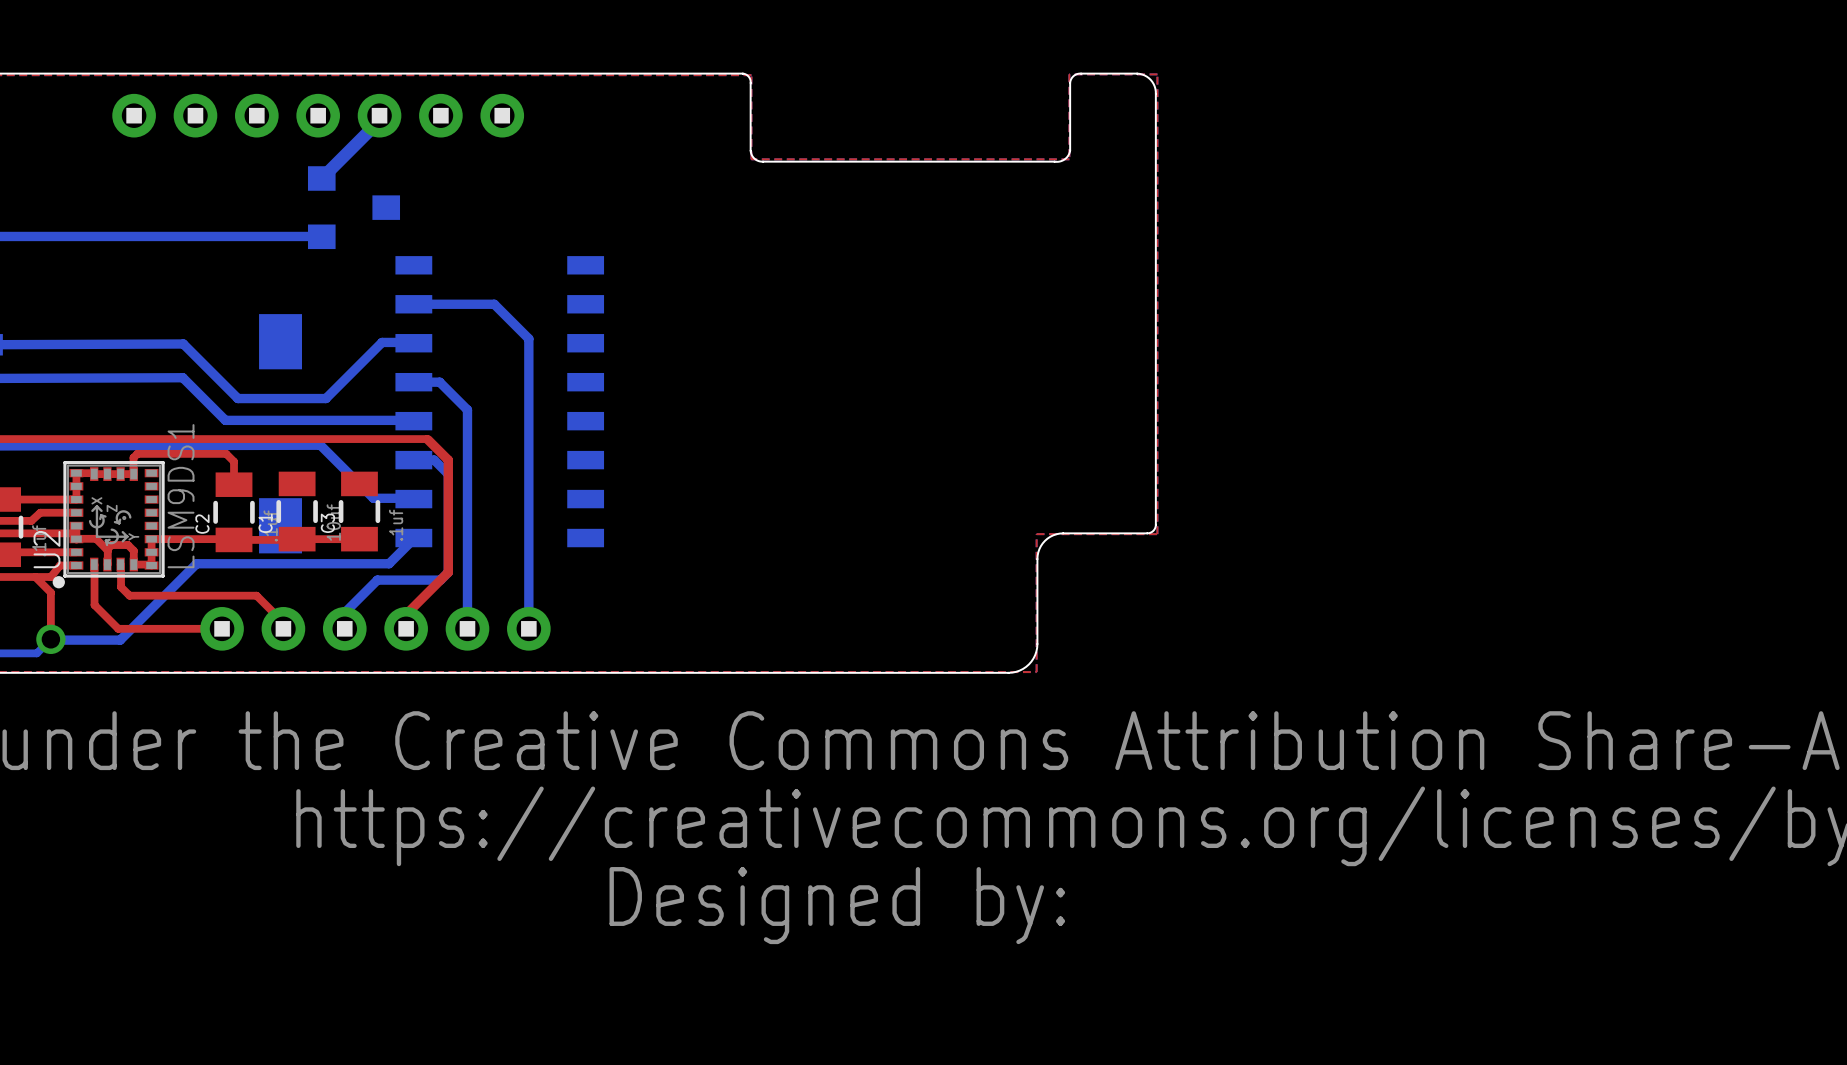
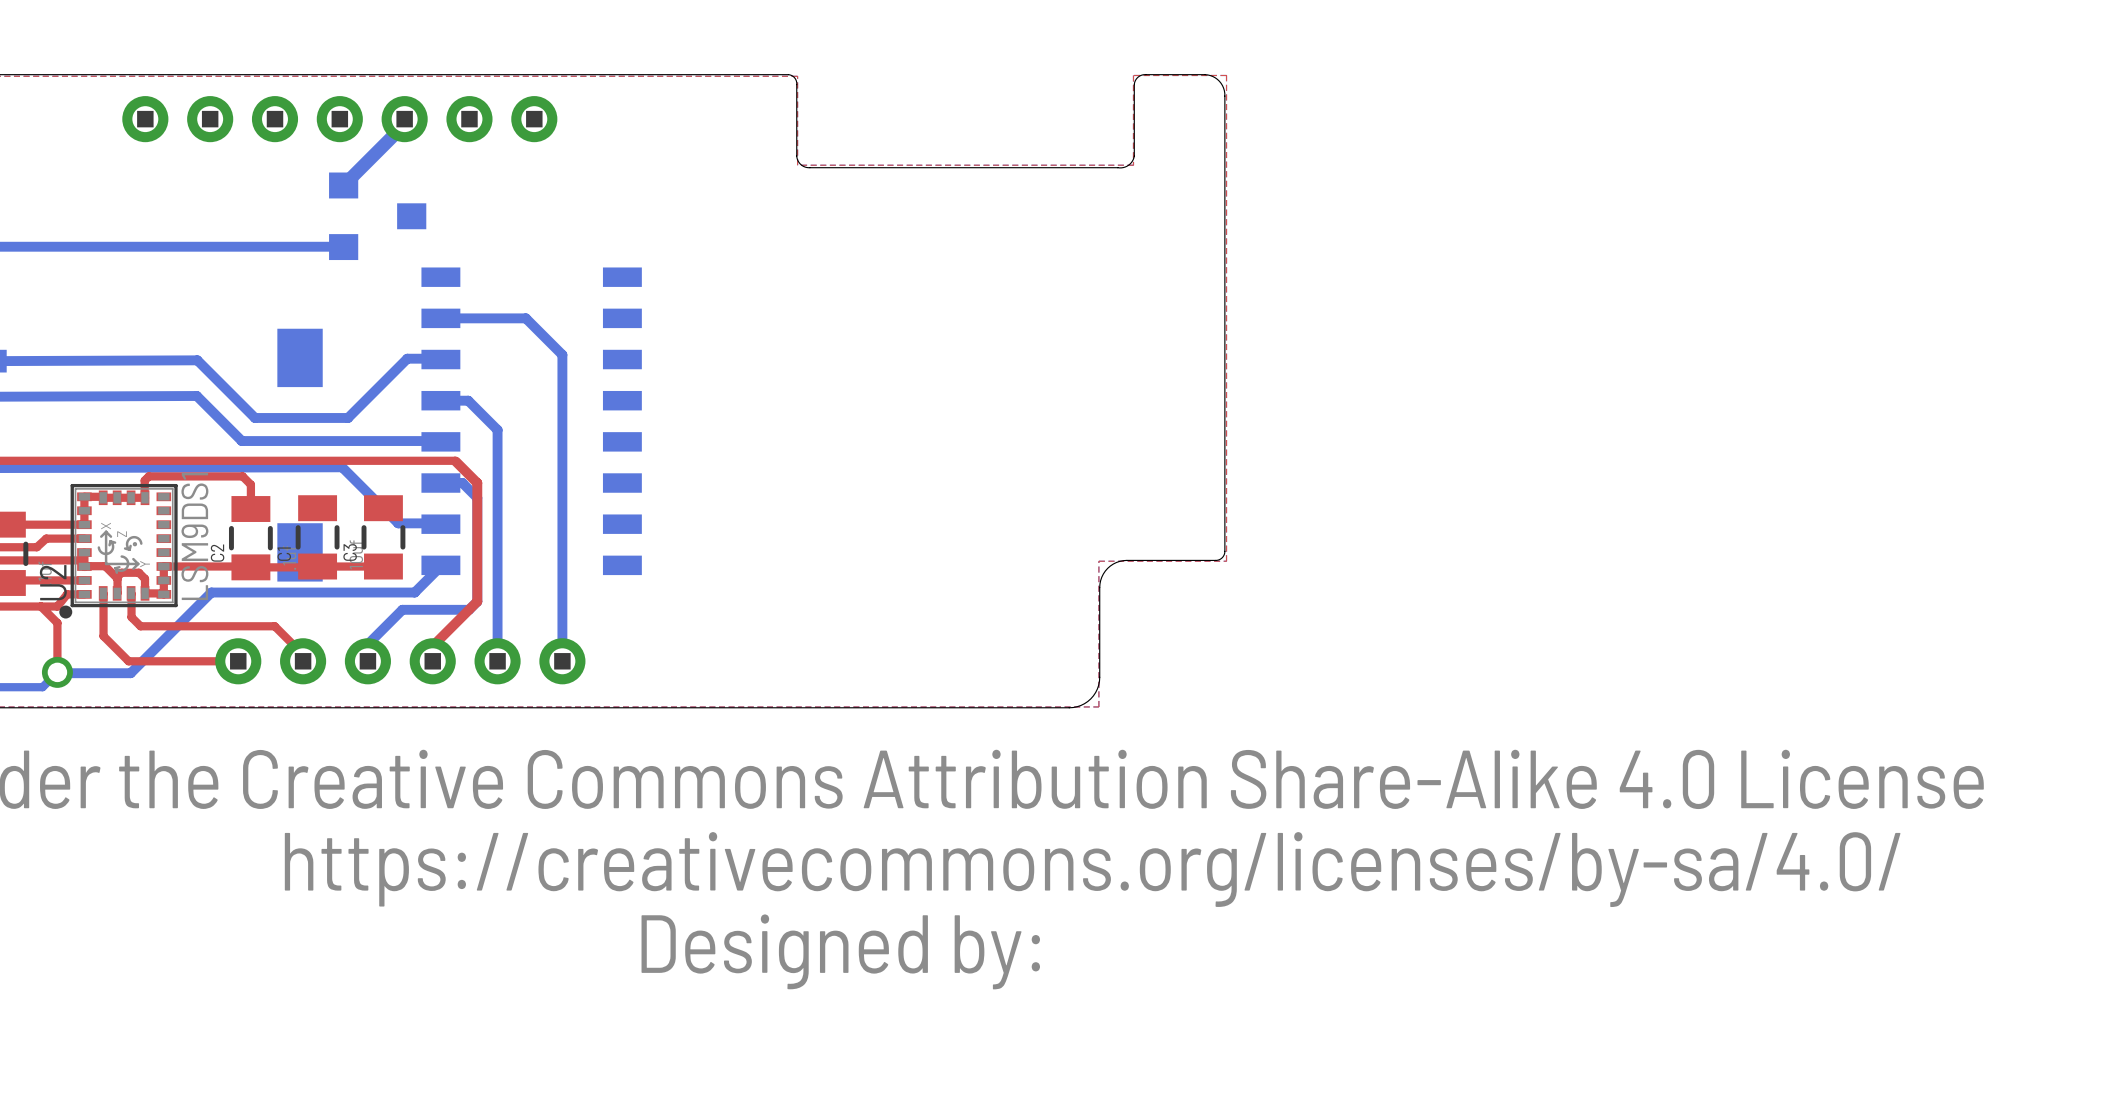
C3 value: .1uf (396, 525) -> none

